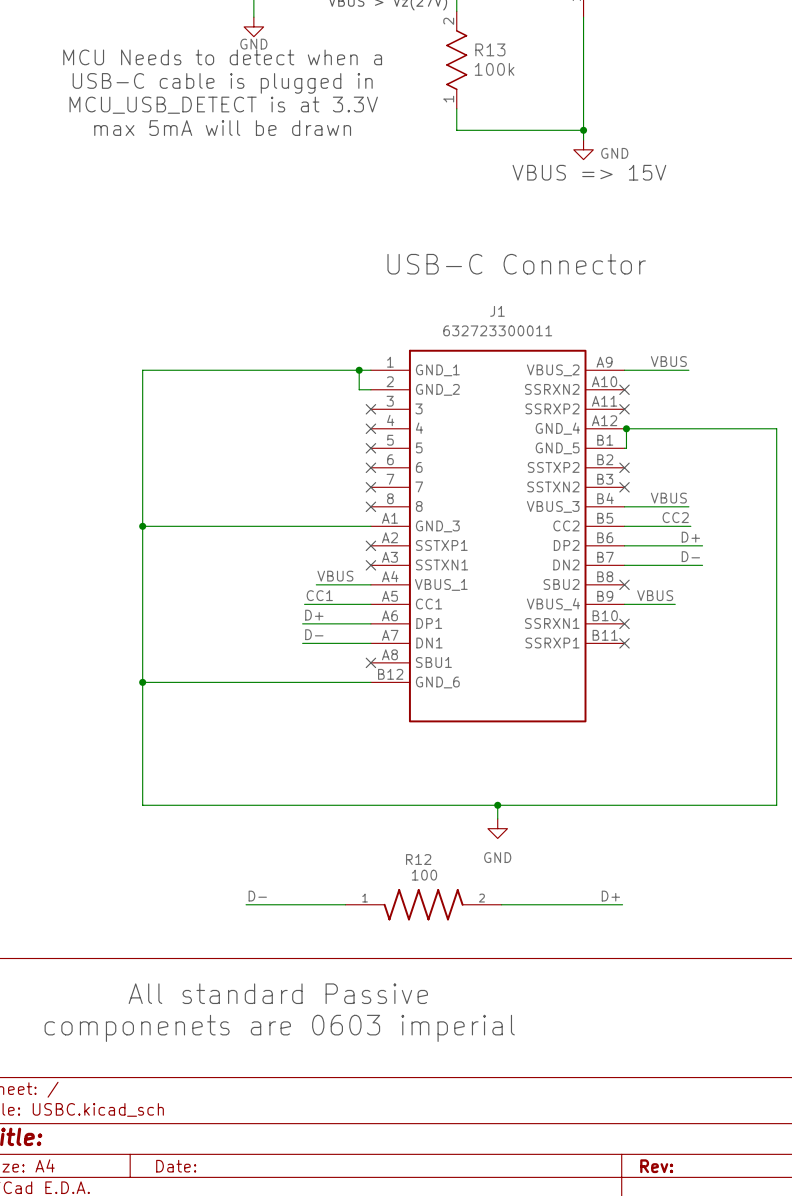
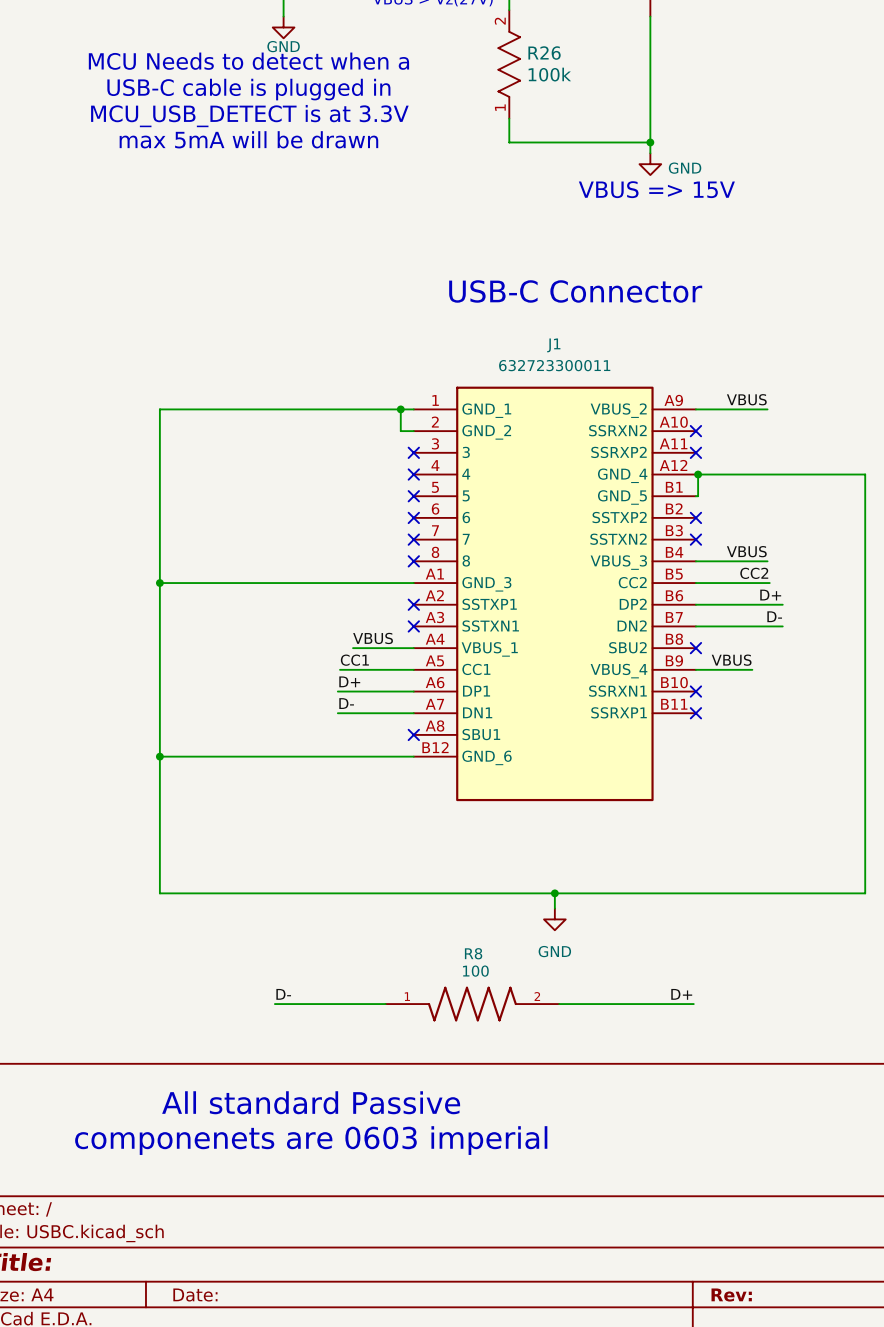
R13 name: R13 (490, 49) -> R26 (544, 53)
R12 name: R12 (418, 859) -> R8 (473, 953)

